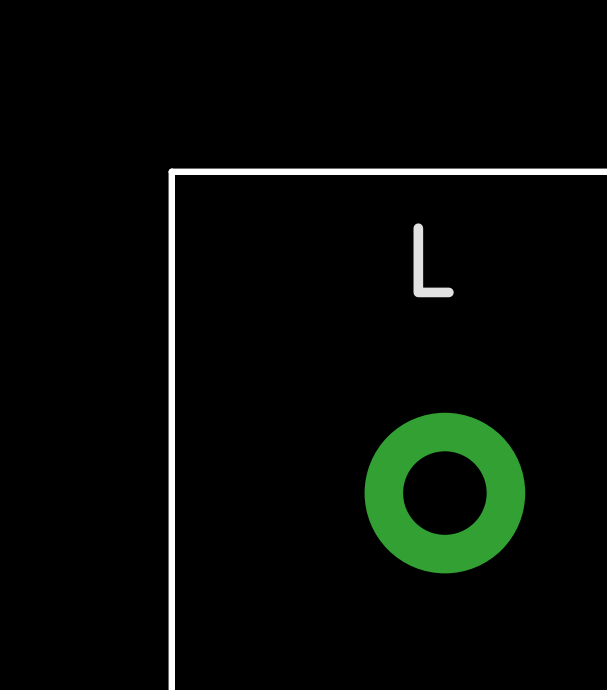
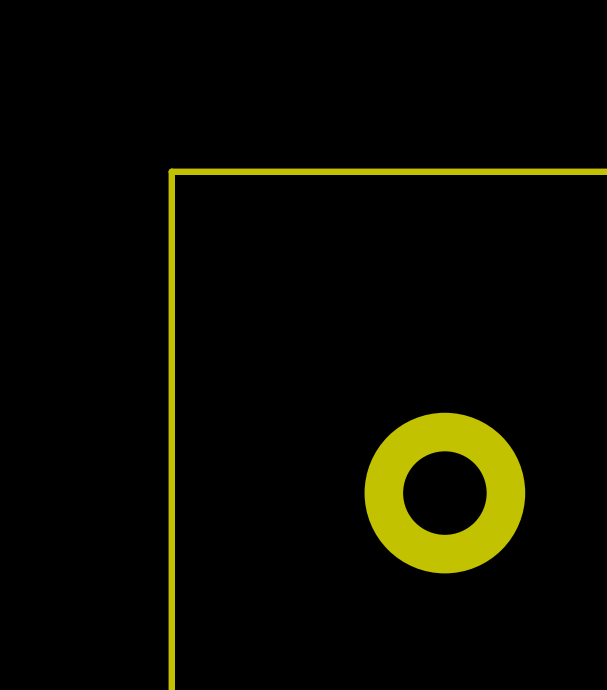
text: L (433, 260) -> none

